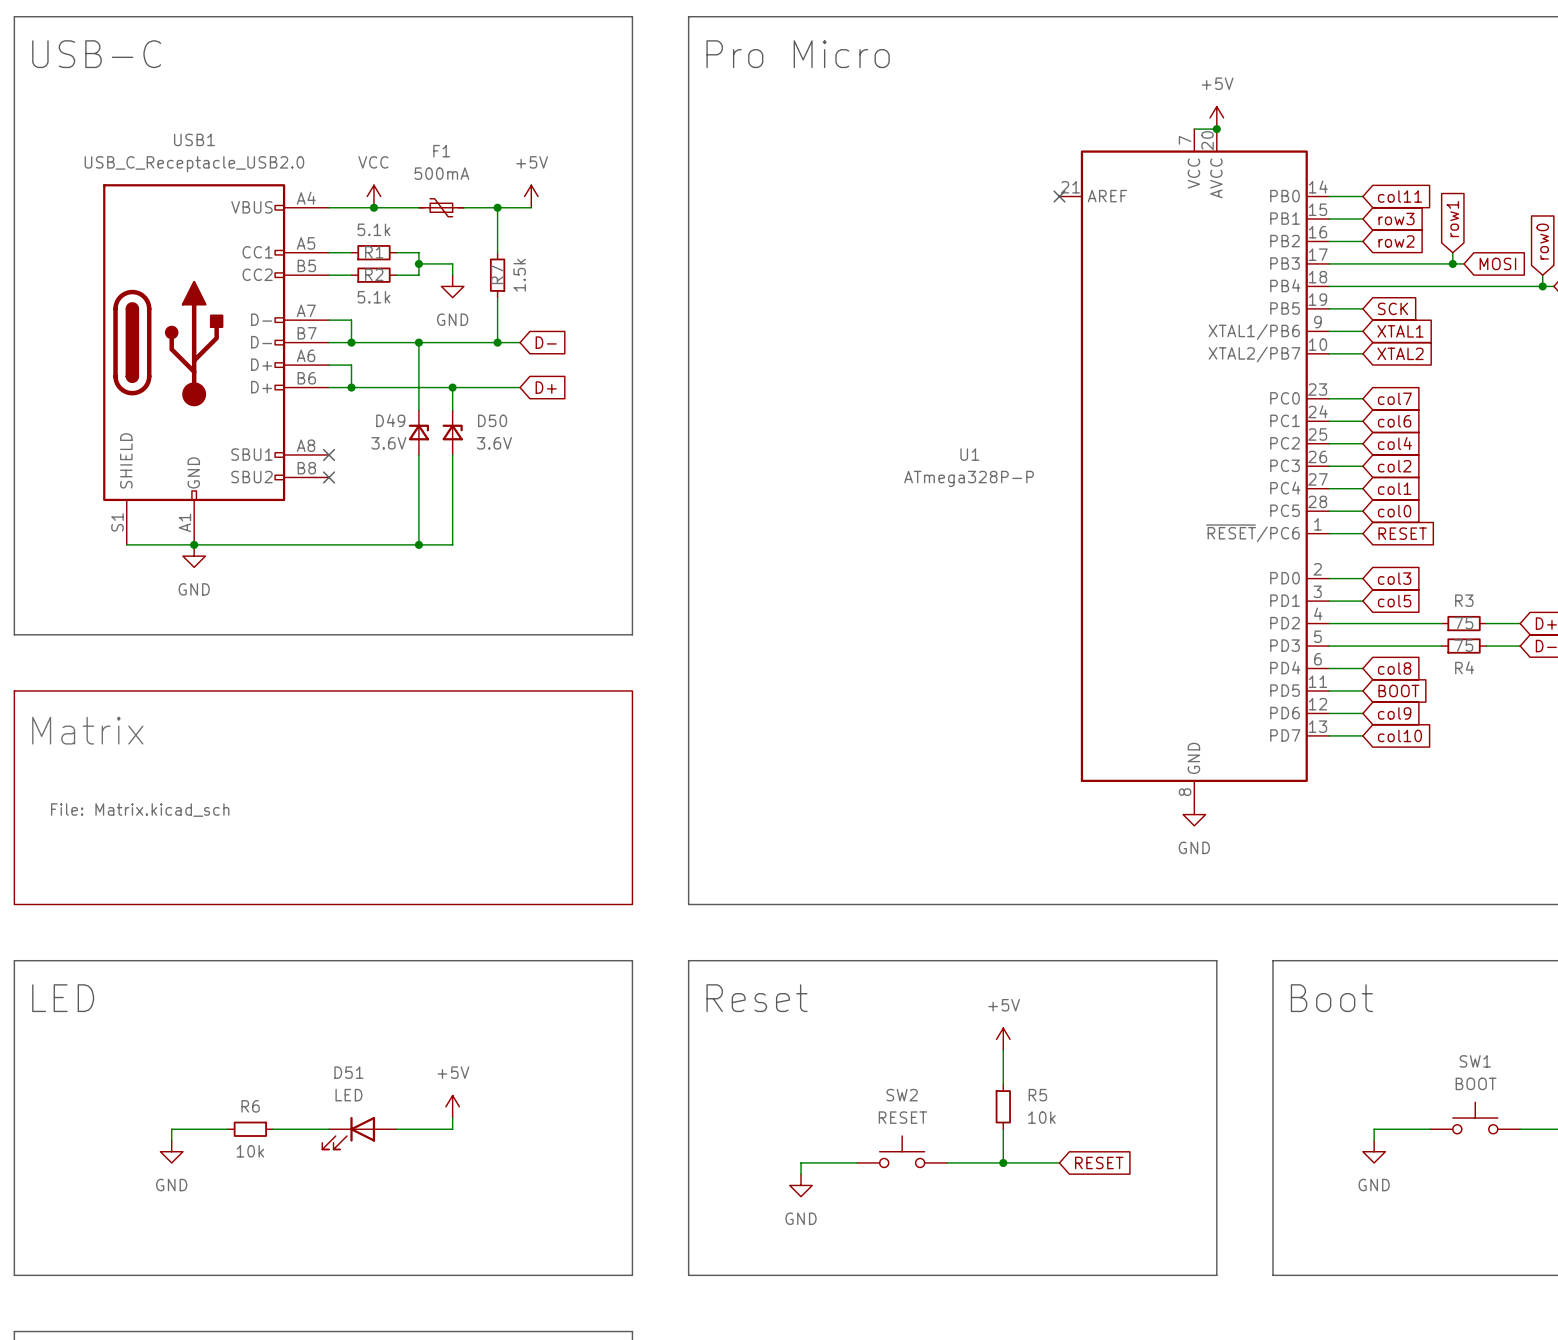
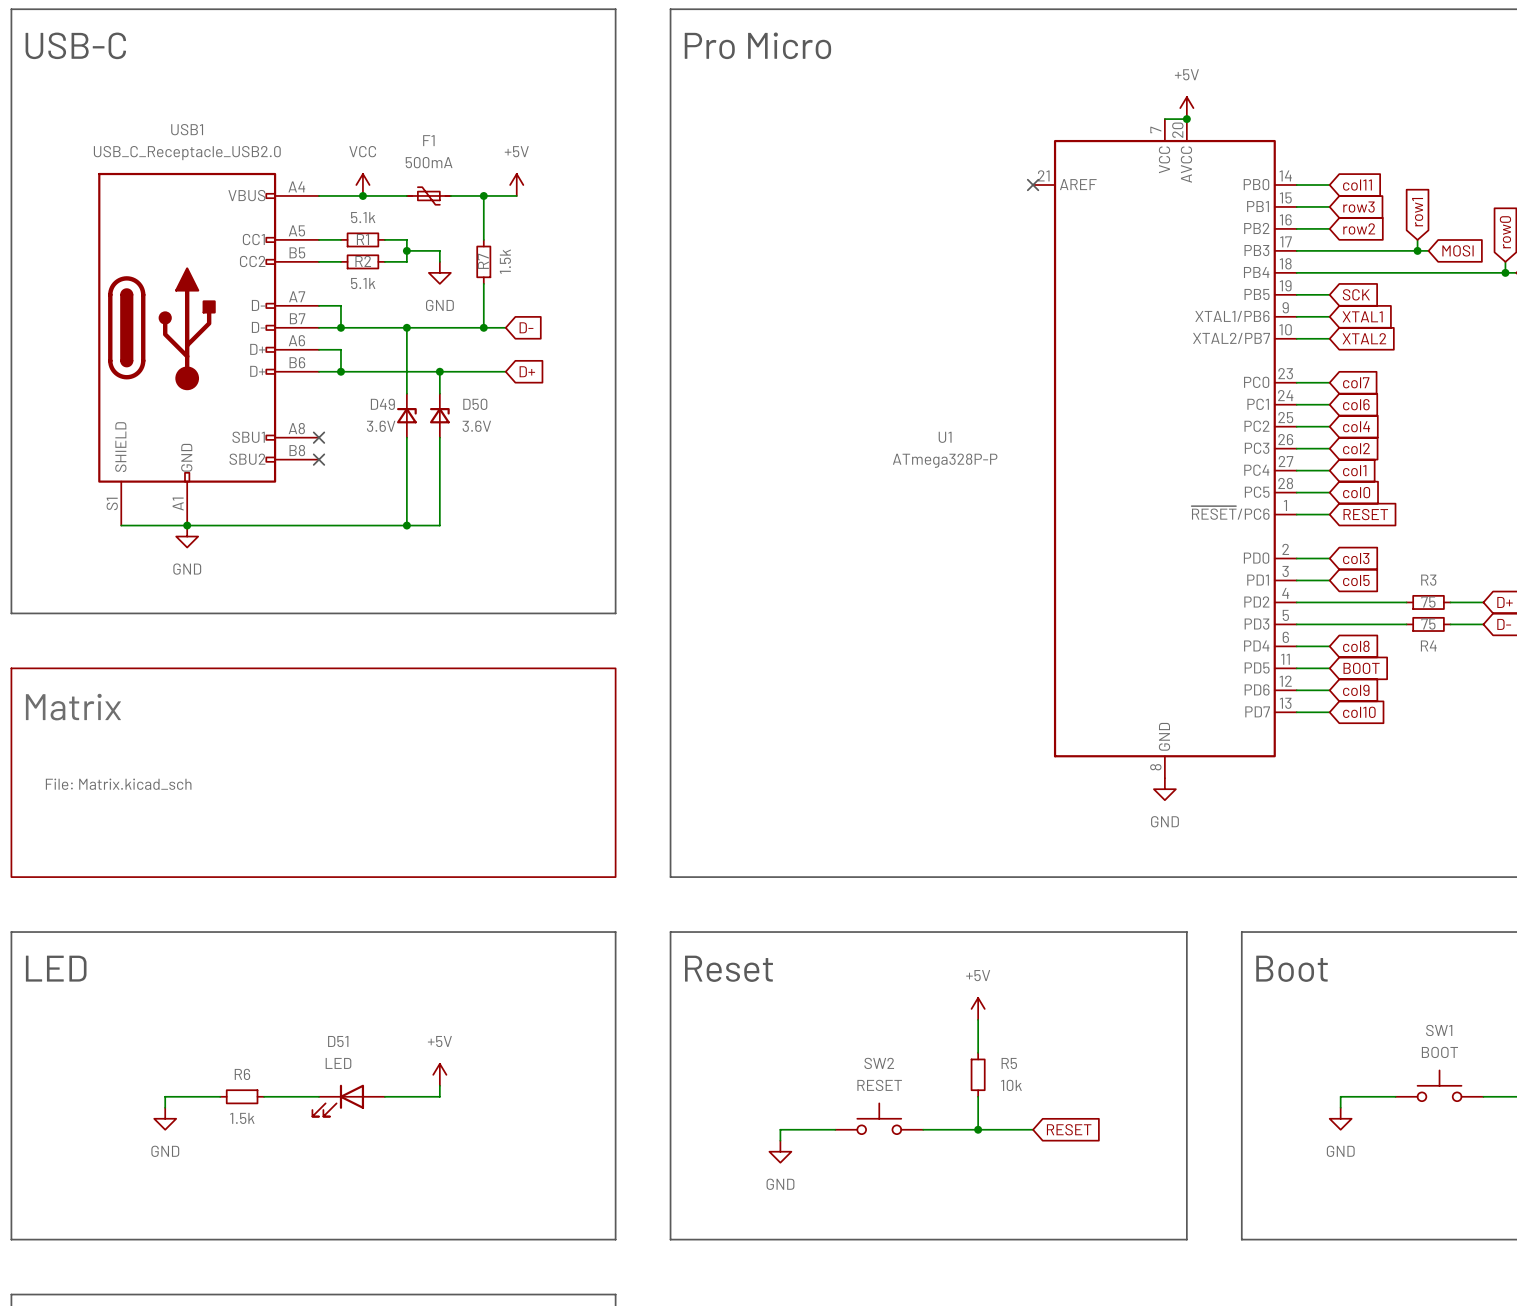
R6 value: 10k (250, 1151) -> 1.5k (242, 1118)

